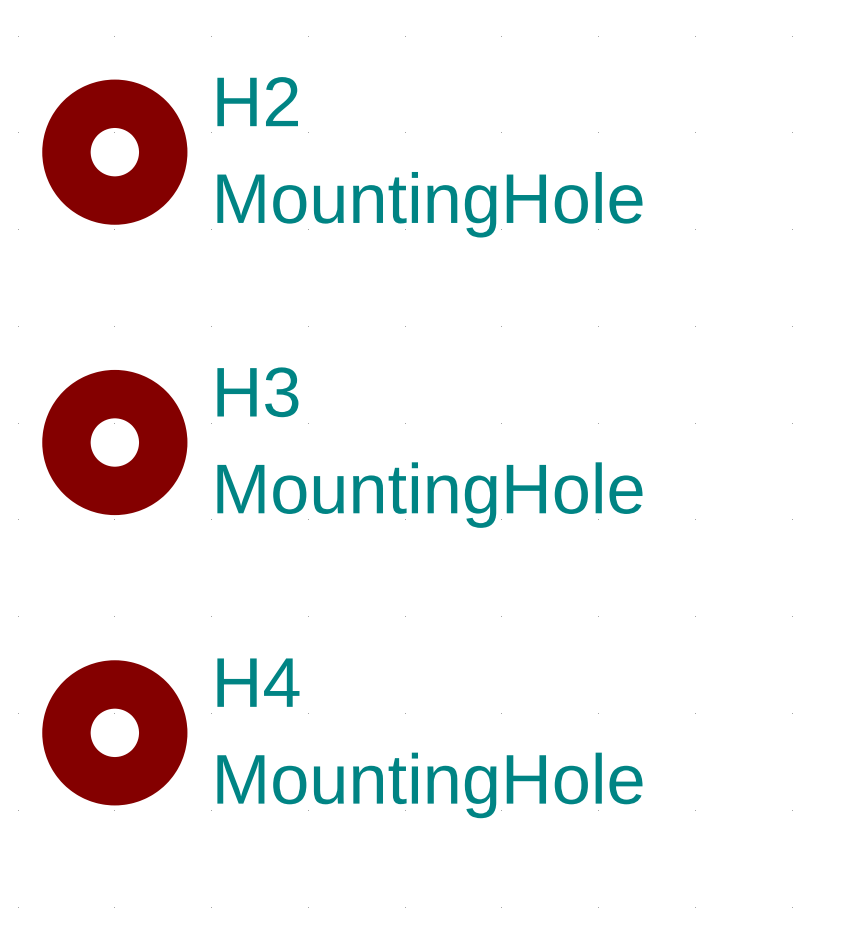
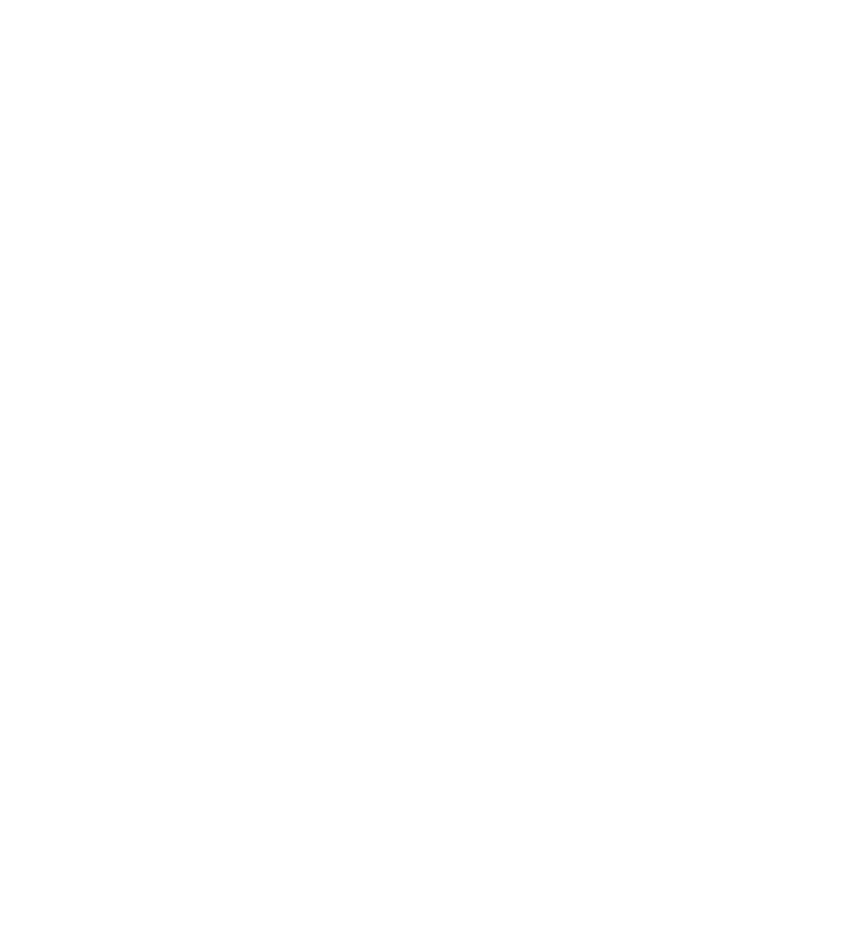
H2: MountingHole (114, 152) -> none
H3: MountingHole (114, 442) -> none
H4: MountingHole (114, 732) -> none

